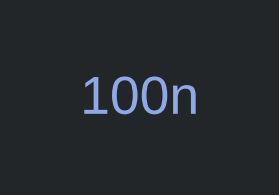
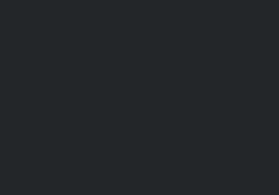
text: 100n (139, 95) -> none

